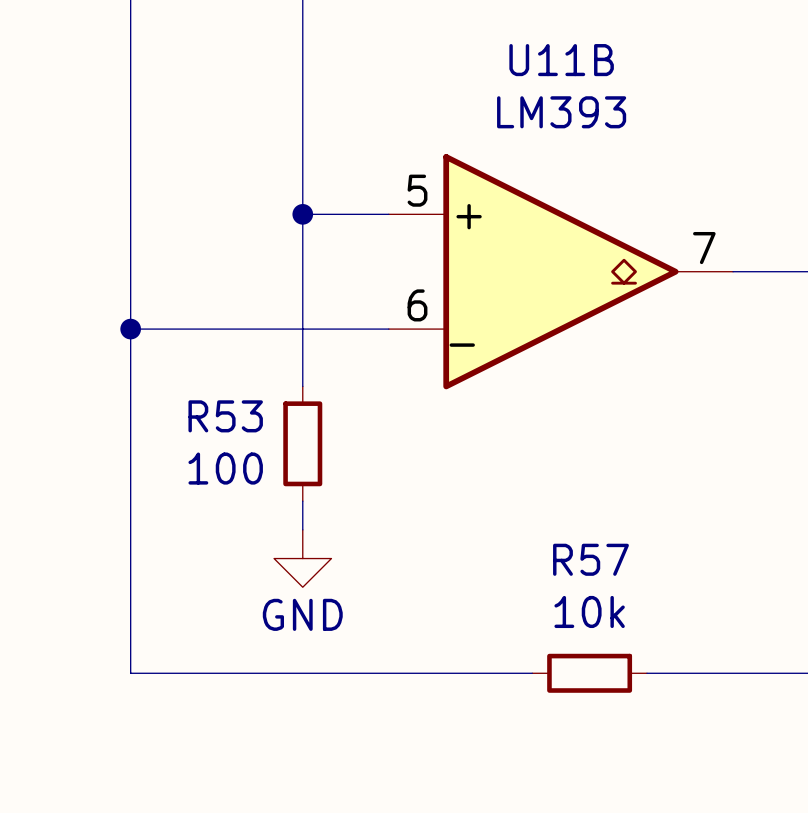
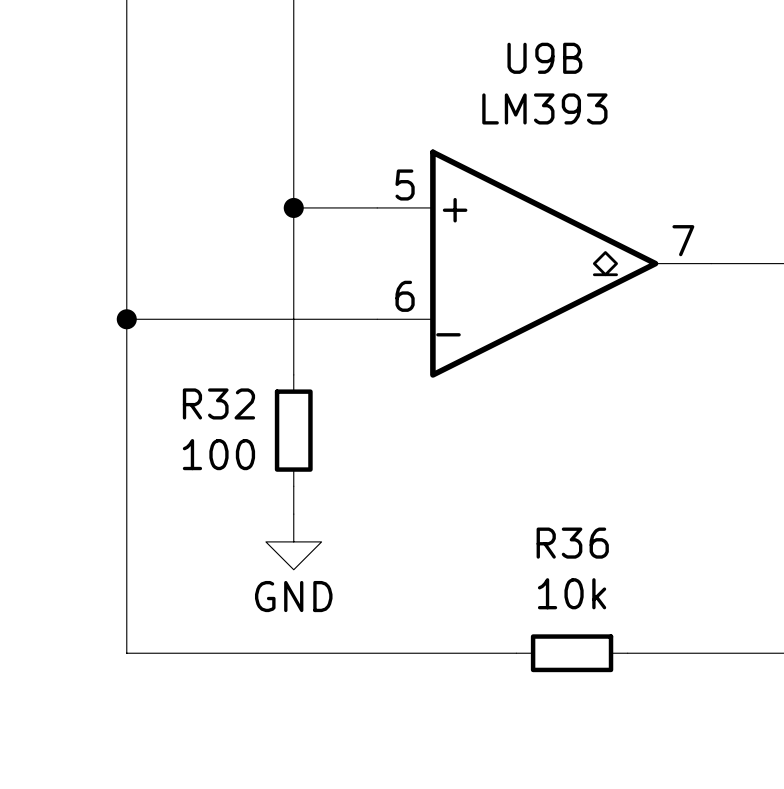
U11B name: U11B (561, 60) -> U9B (544, 58)
R53 name: R53 (225, 416) -> R32 (218, 403)
R57 name: R57 (590, 559) -> R36 (572, 543)

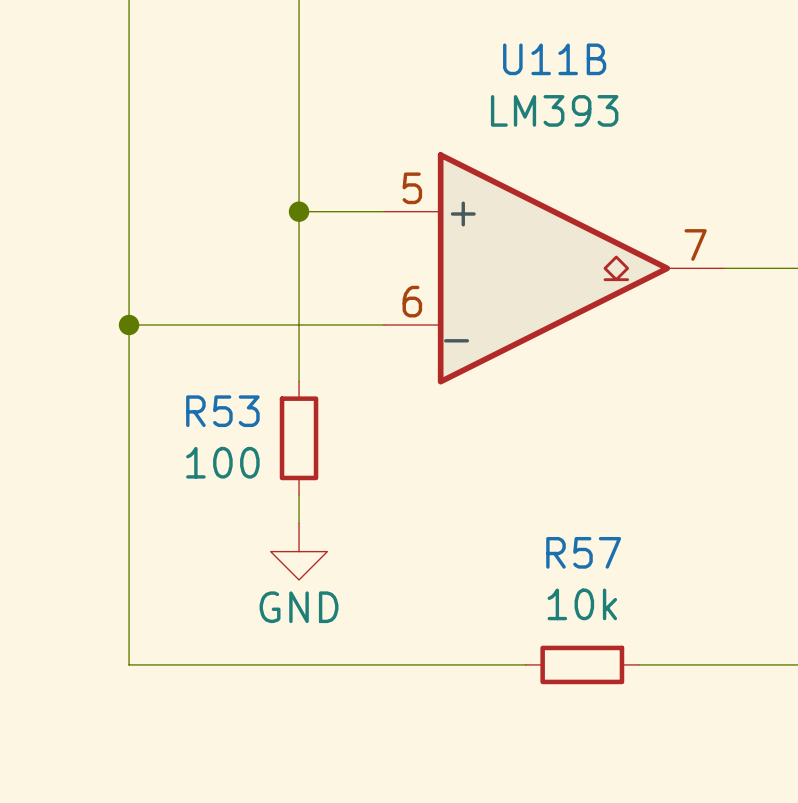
U9B name: U9B (544, 58) -> U11B (554, 59)
R32 name: R32 (218, 403) -> R53 (222, 411)
R36 name: R36 (572, 543) -> R57 (583, 552)

